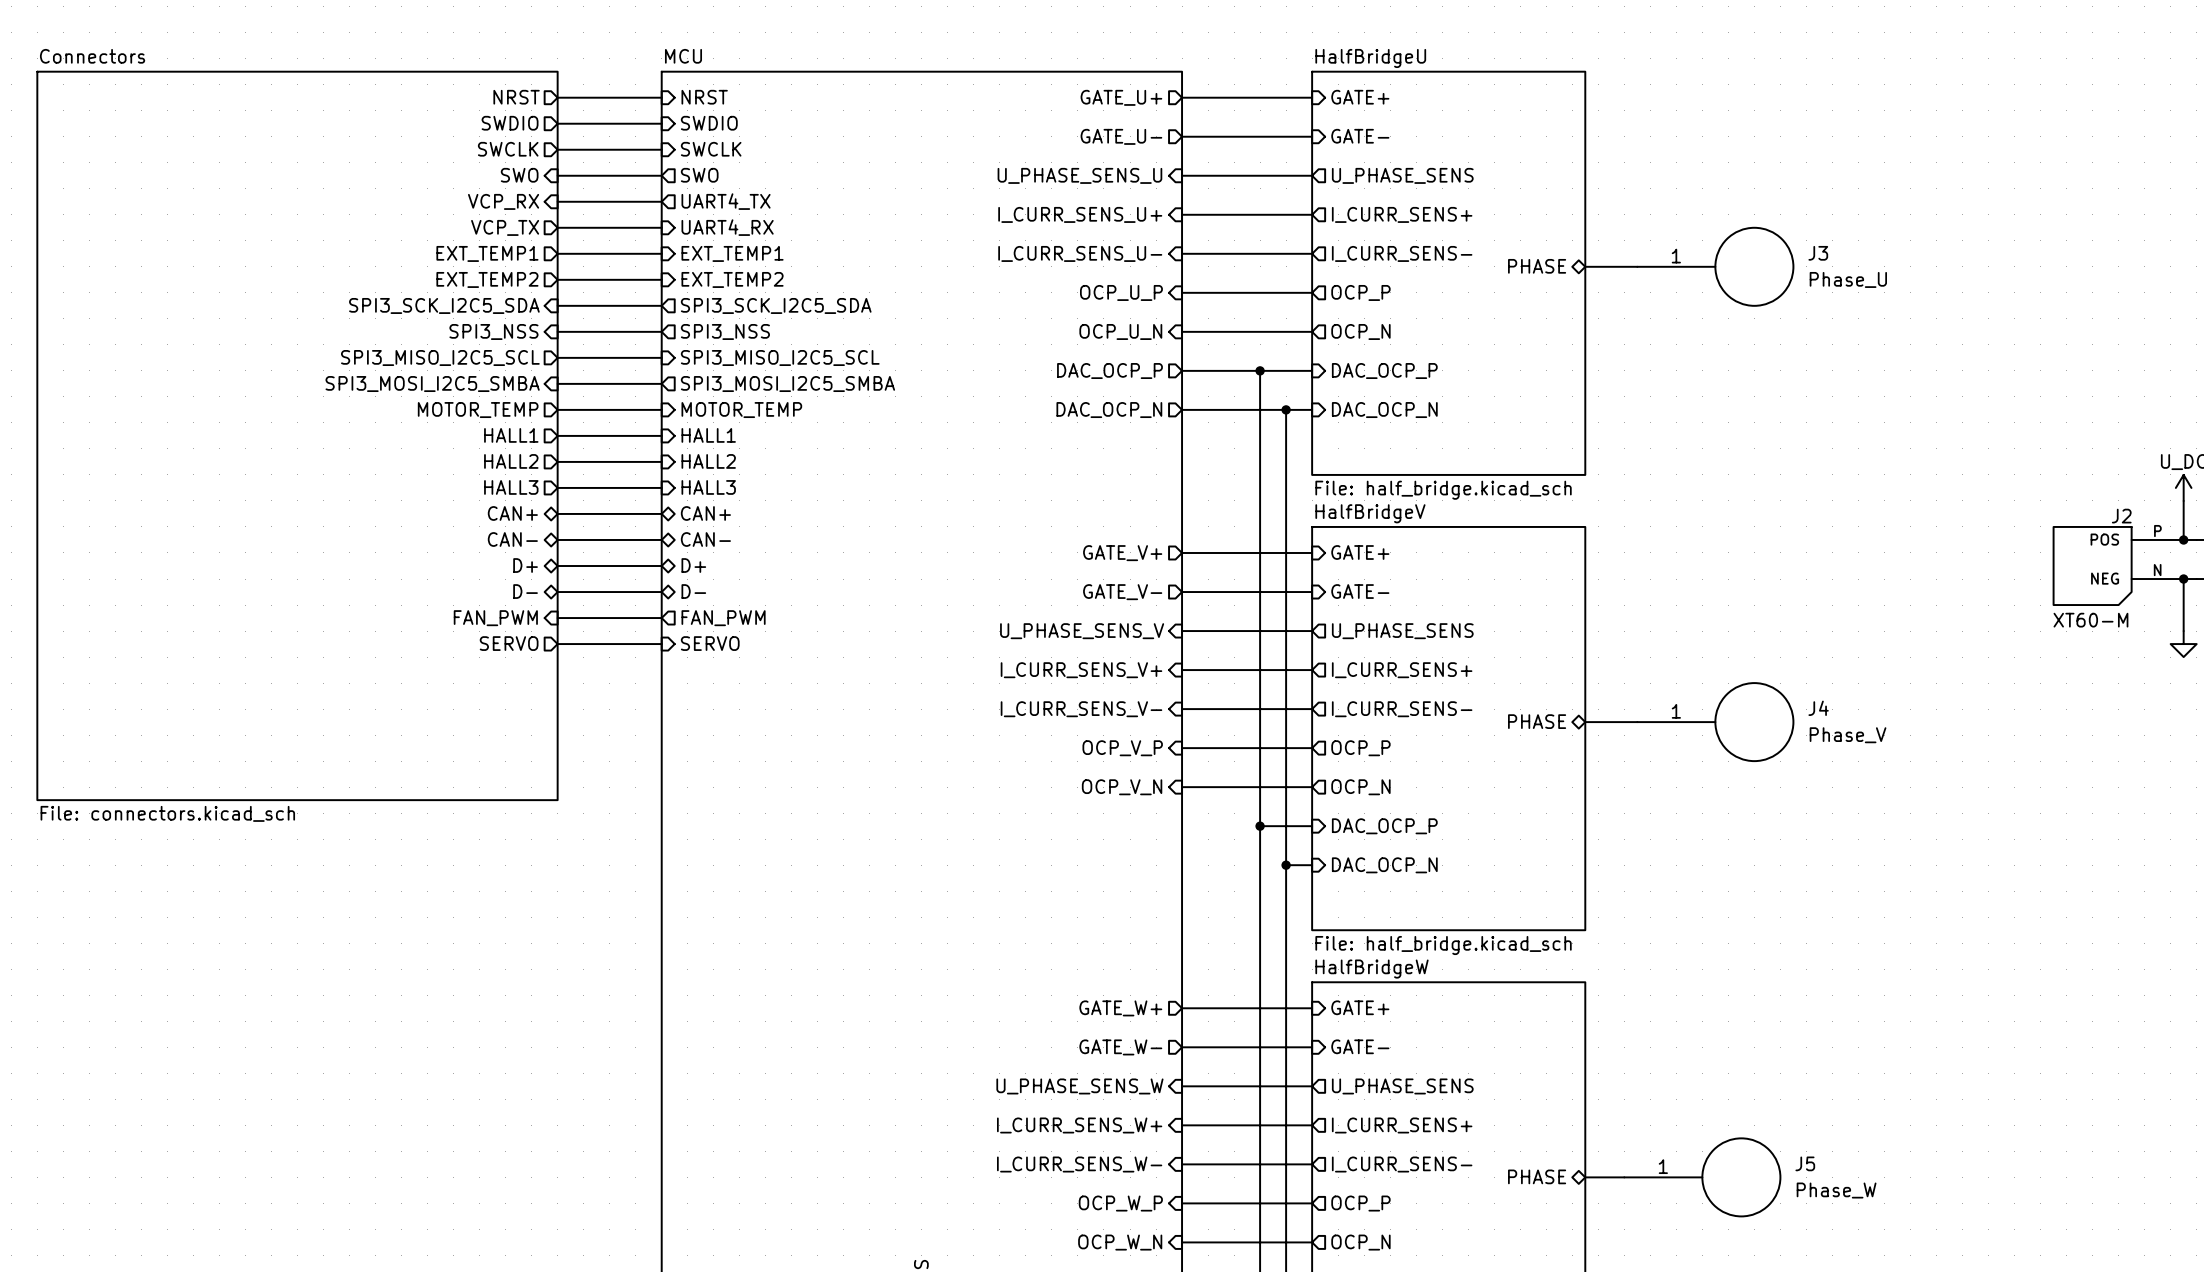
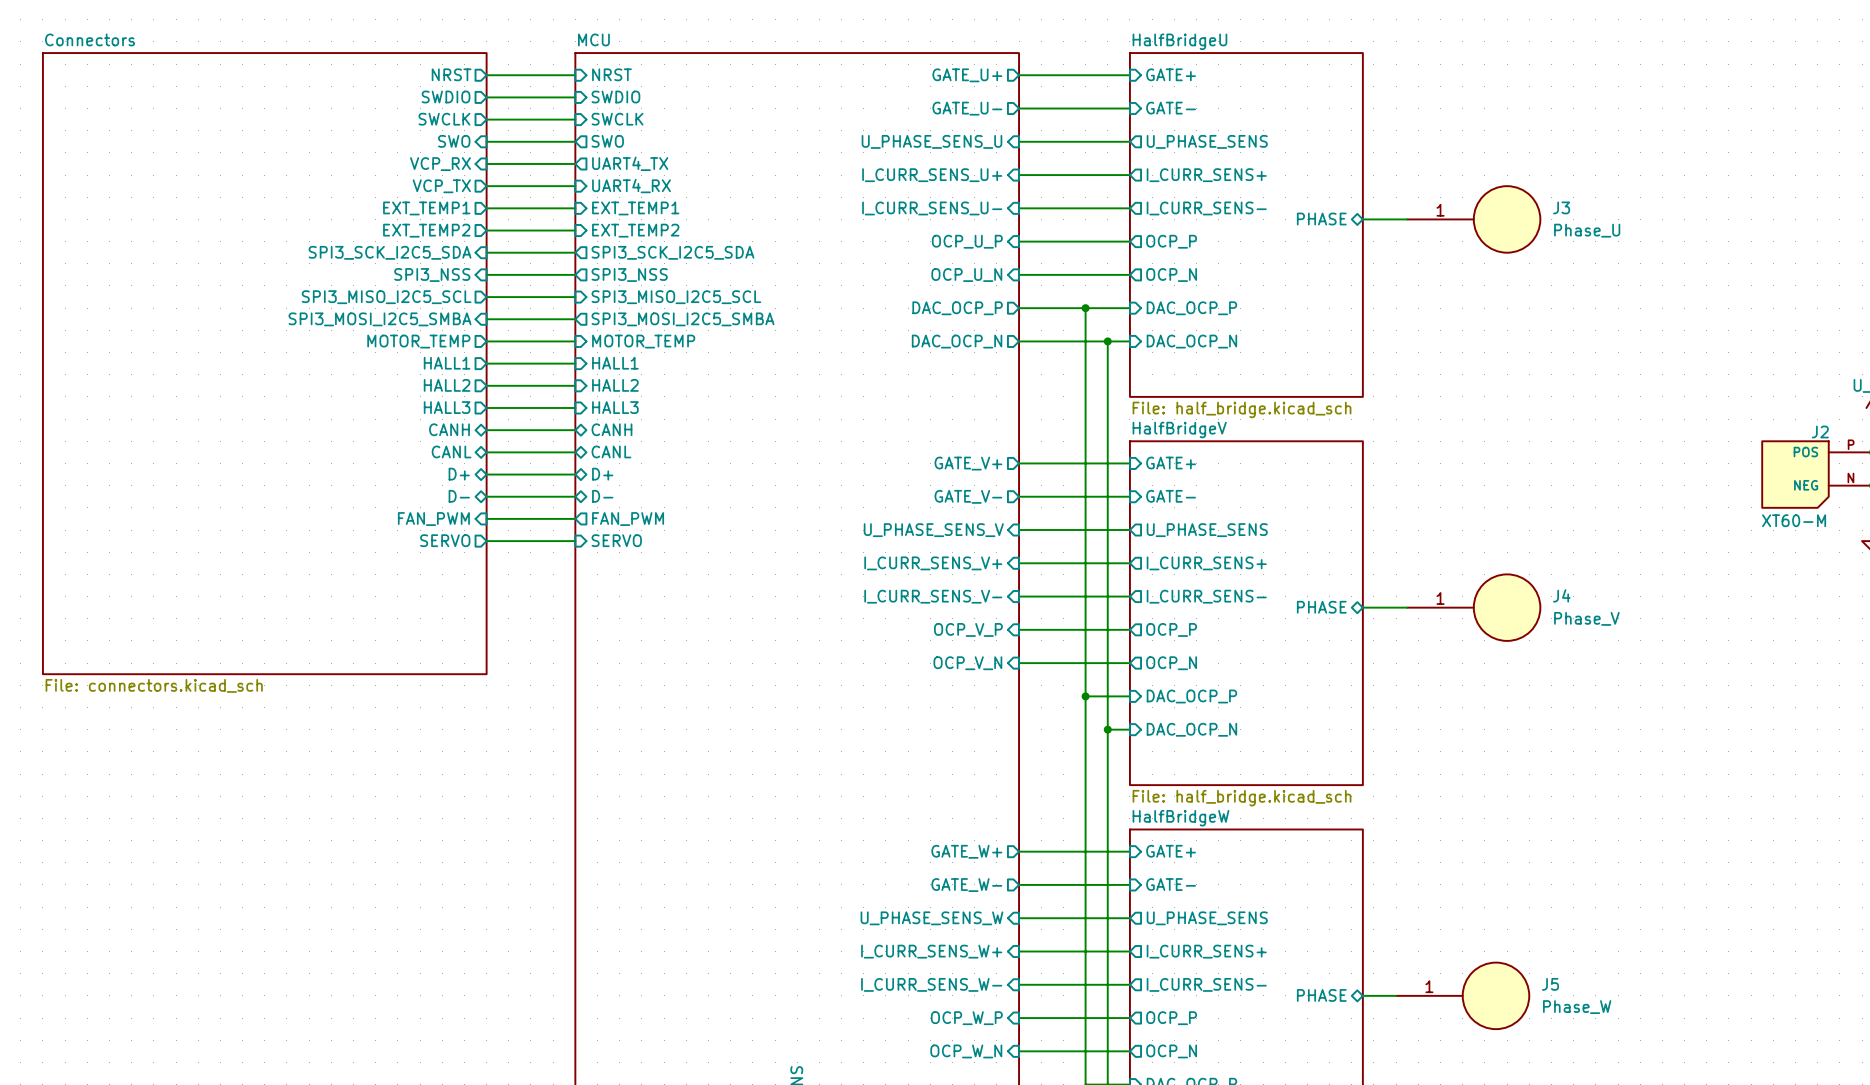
sheet pin: CAN+ (512, 513) -> CANH (449, 429)
sheet pin: CAN+ (705, 513) -> CANH (611, 429)
sheet pin: CAN- (512, 539) -> CANL (451, 451)
sheet pin: CAN- (705, 539) -> CANL (611, 451)

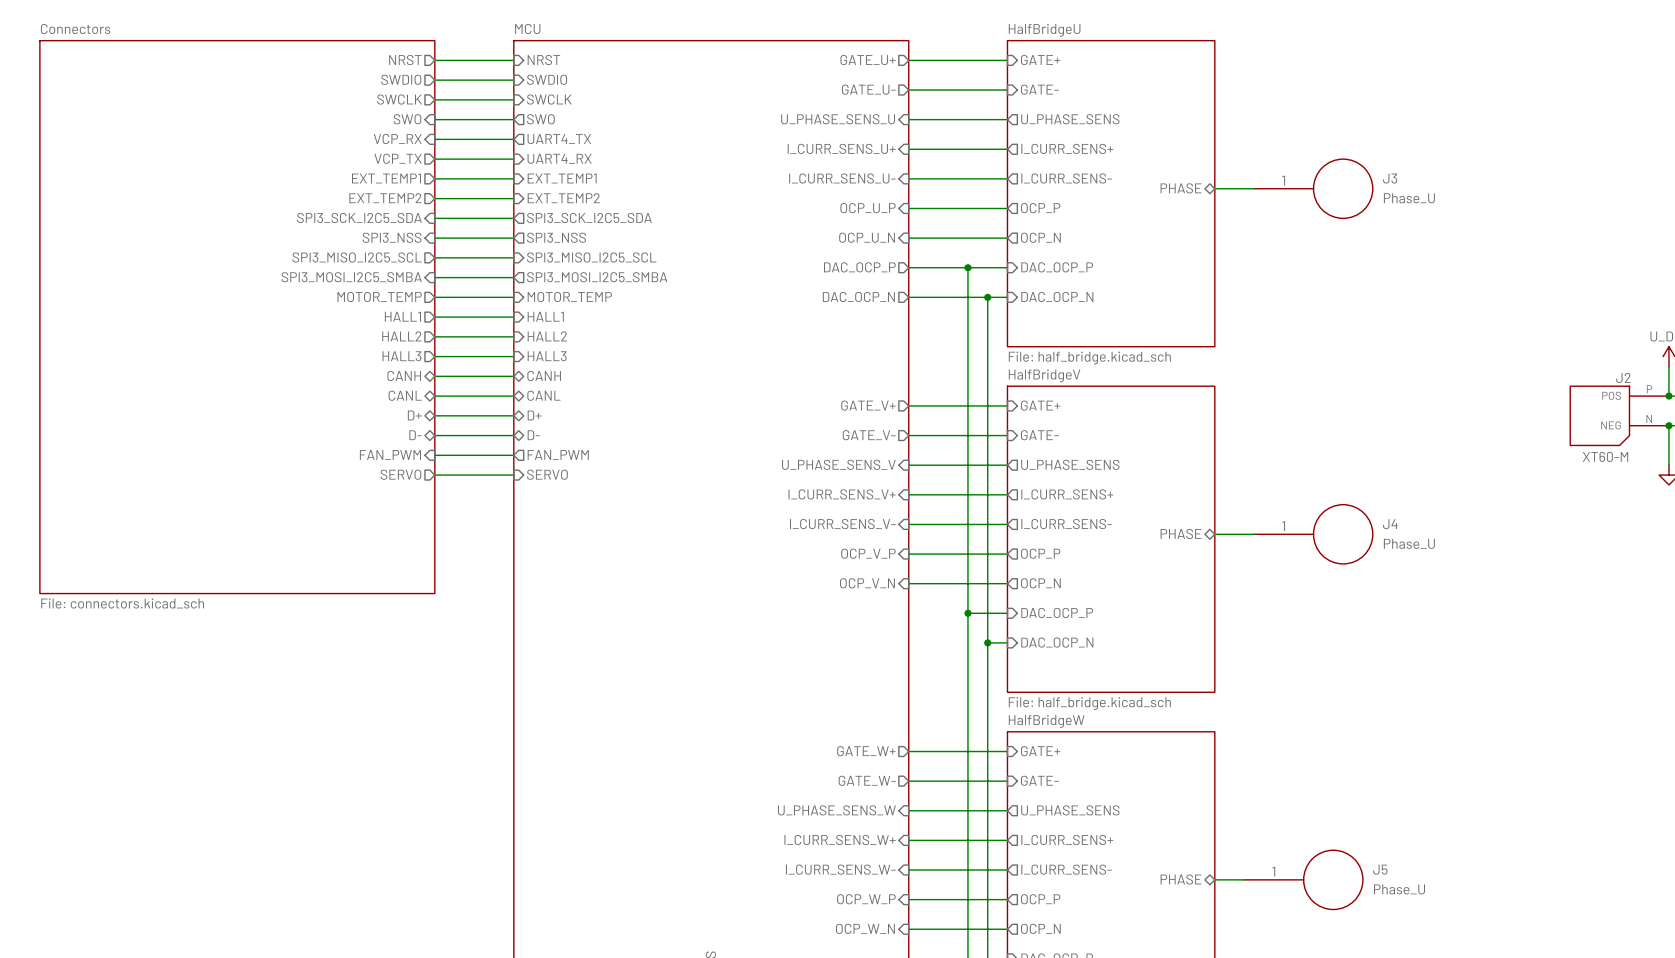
J4 value: Phase_V (1586, 618) -> Phase_U (1409, 543)
J5 value: Phase_W (1577, 1007) -> Phase_U (1399, 889)

